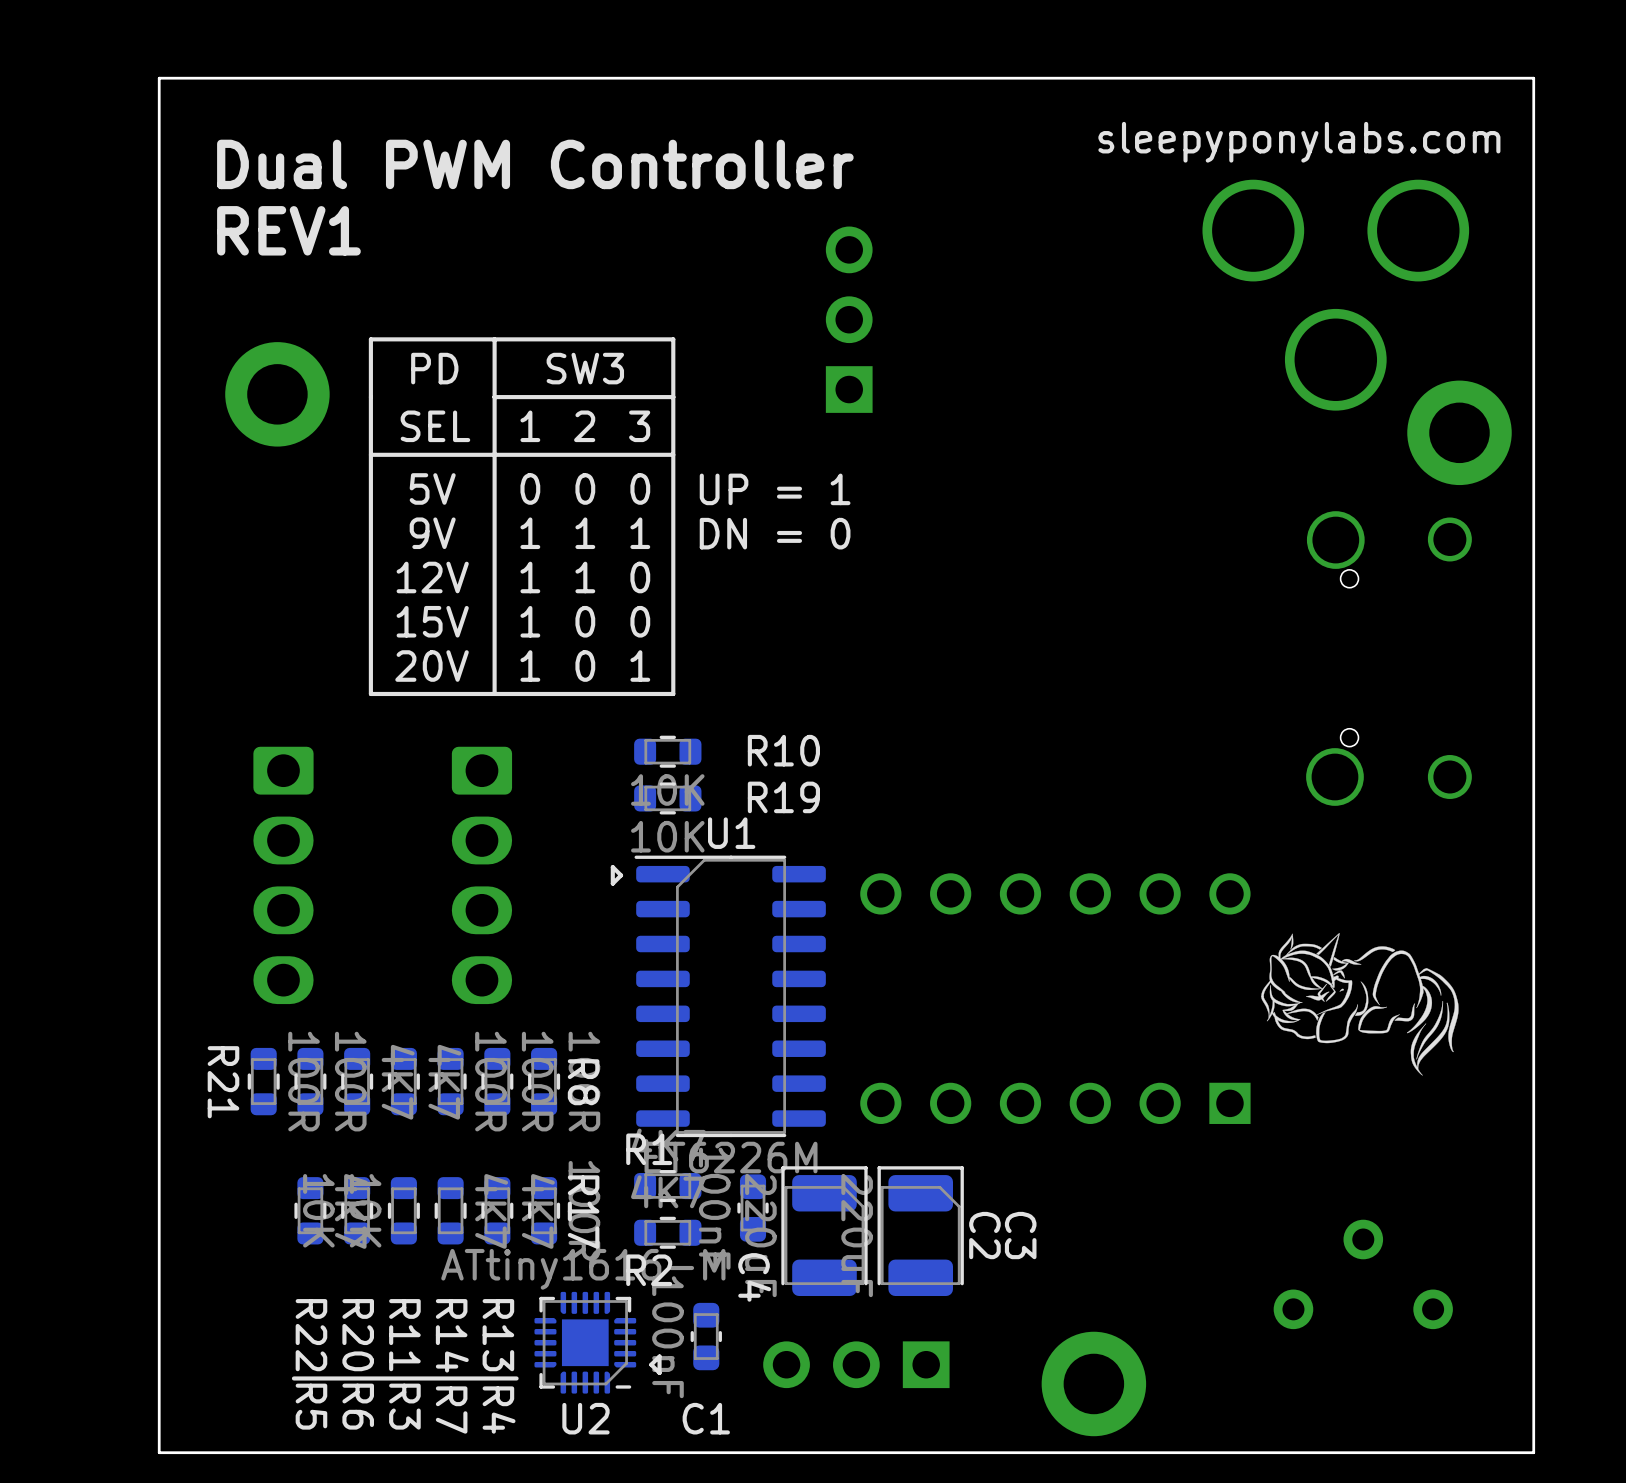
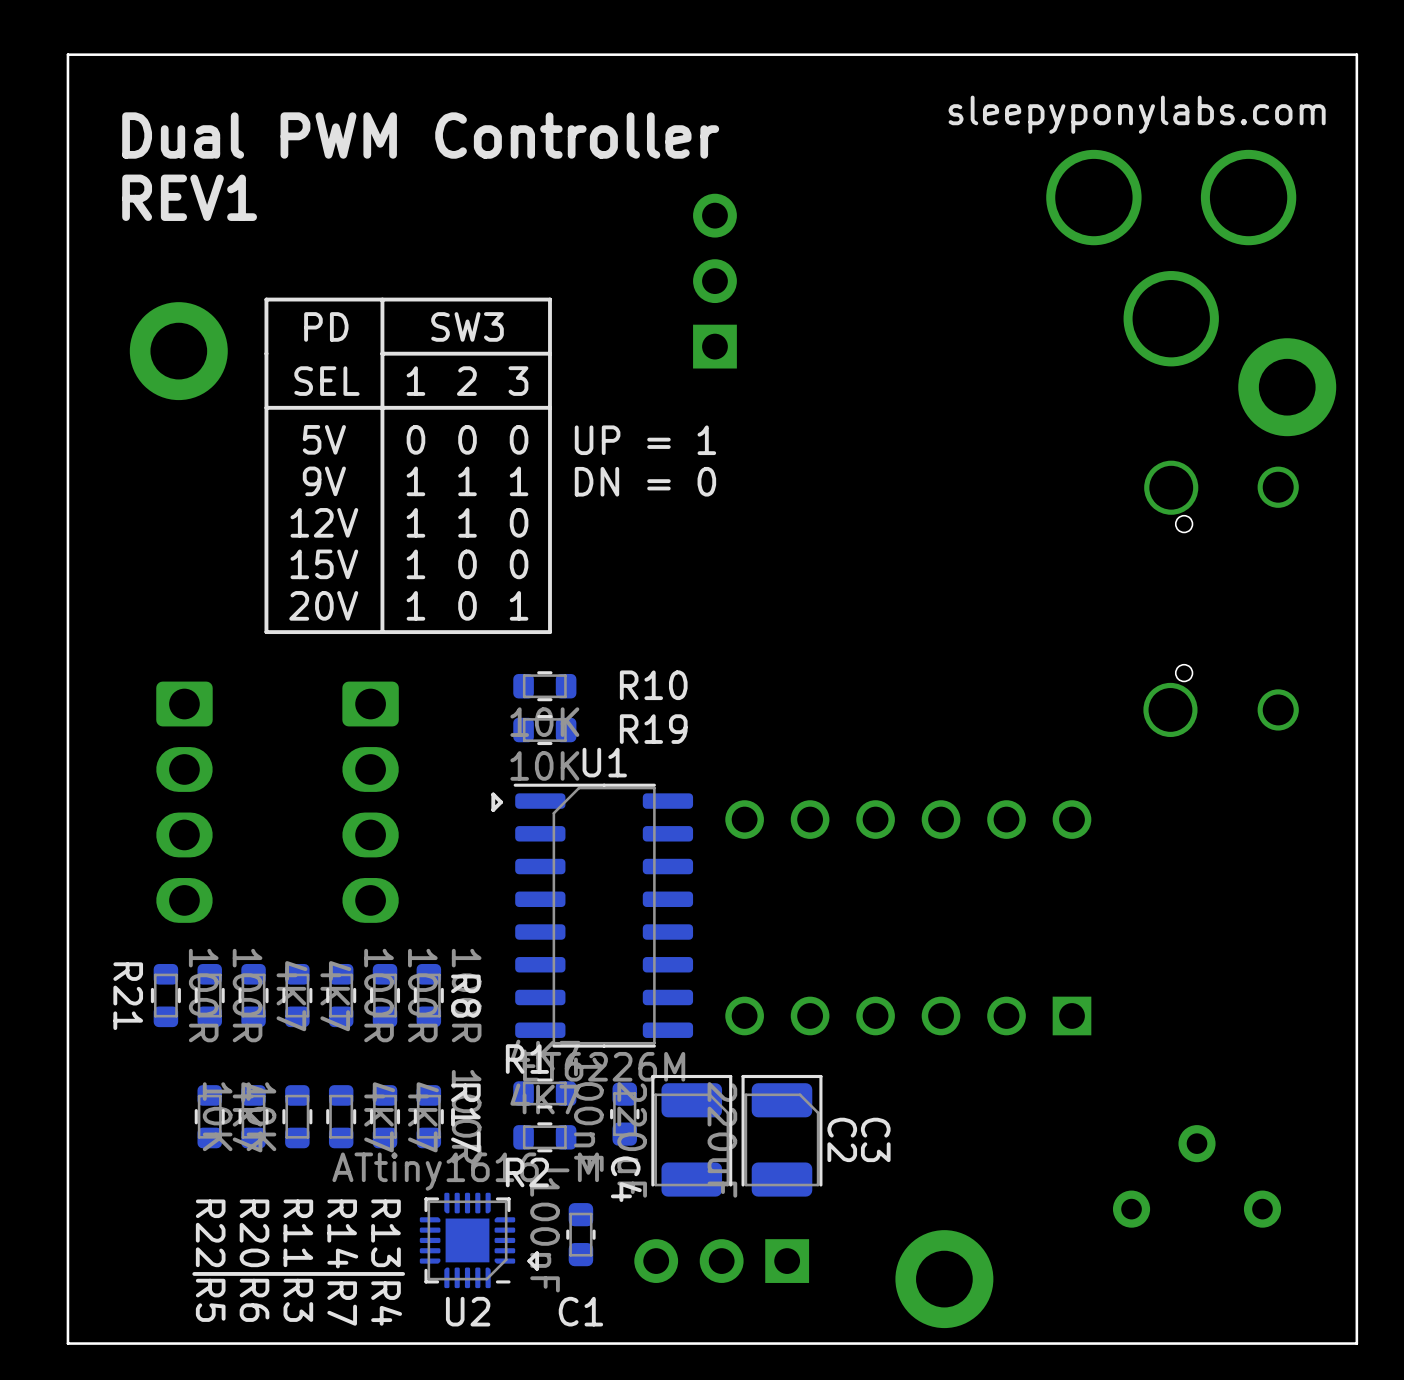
drawing: [1261, 933, 1459, 1076] -> none

